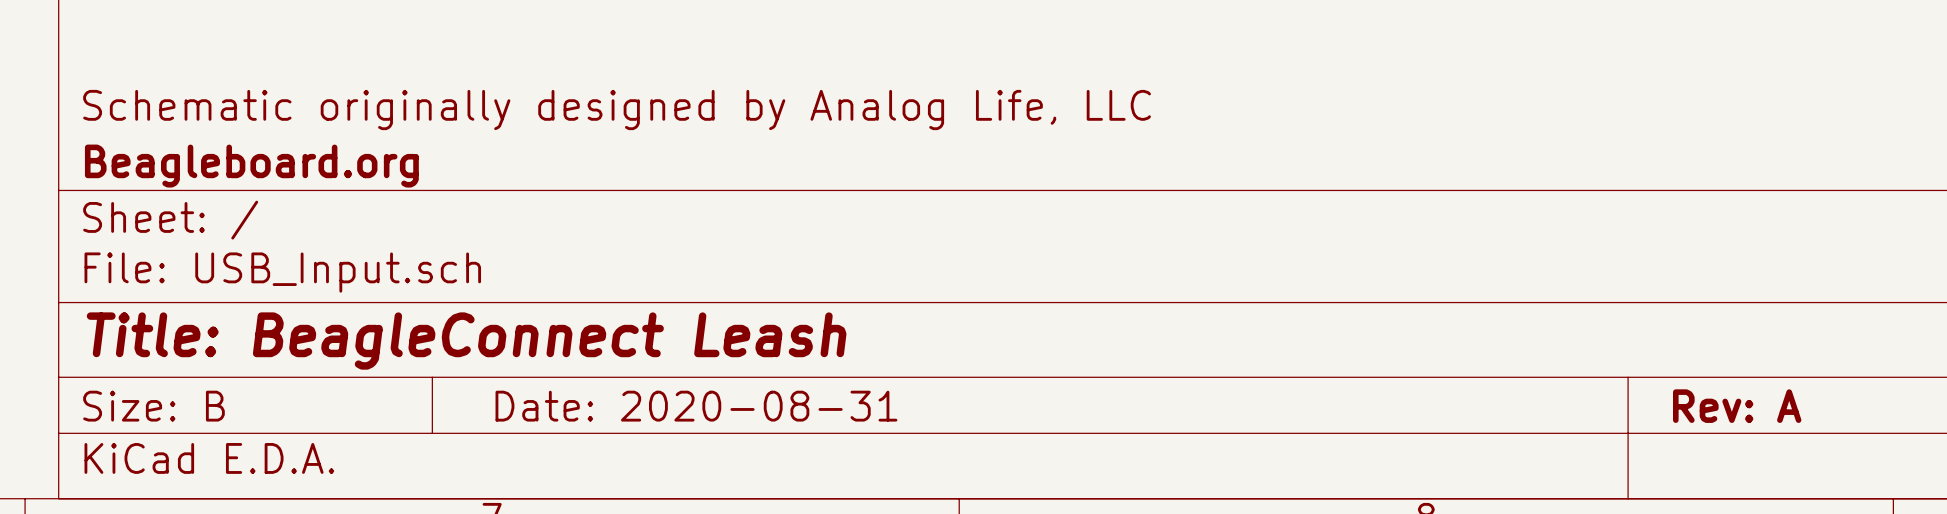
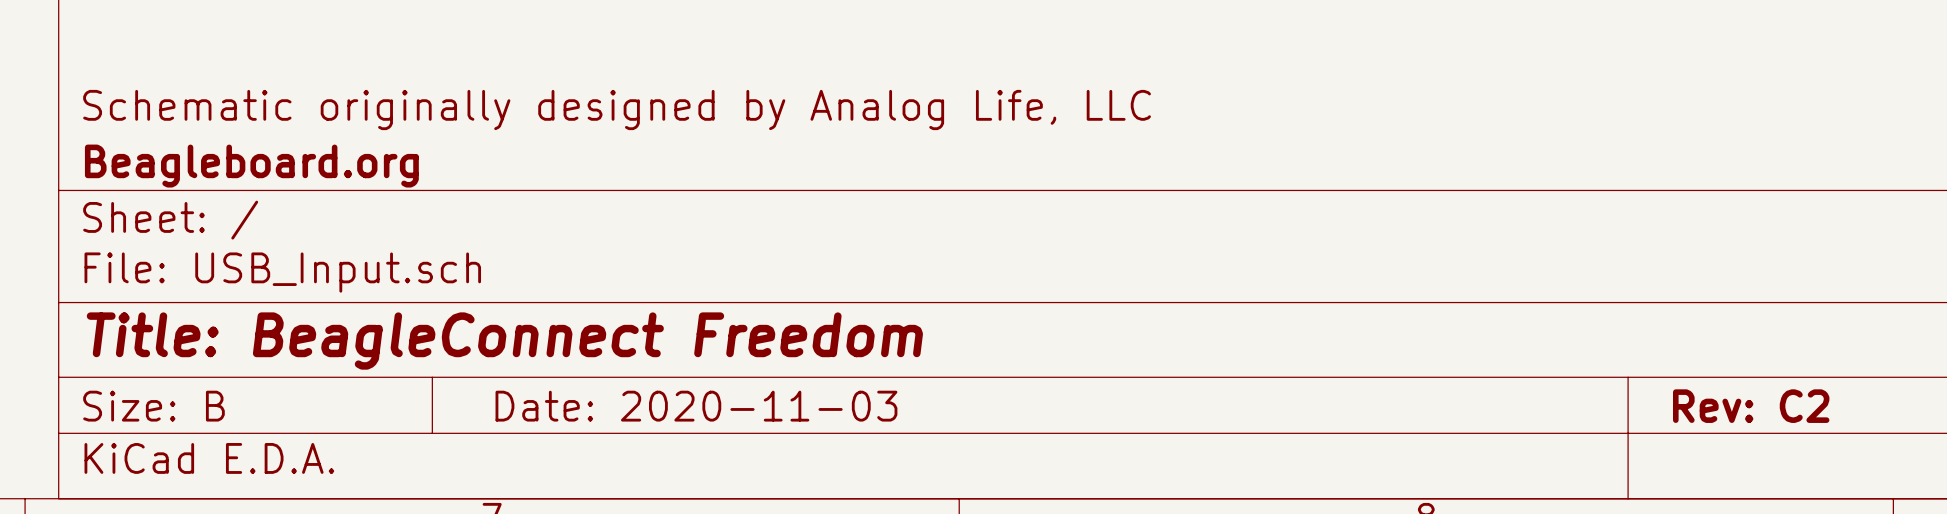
title block: Title: BeagleConnect Leash (466, 341) -> Title: BeagleConnect Freedom (504, 341)
title block: Date: 2020-08-31 (696, 406) -> Date: 2020-11-03 (696, 406)
title block: Rev: A (1737, 406) -> Rev: C2 (1751, 406)

